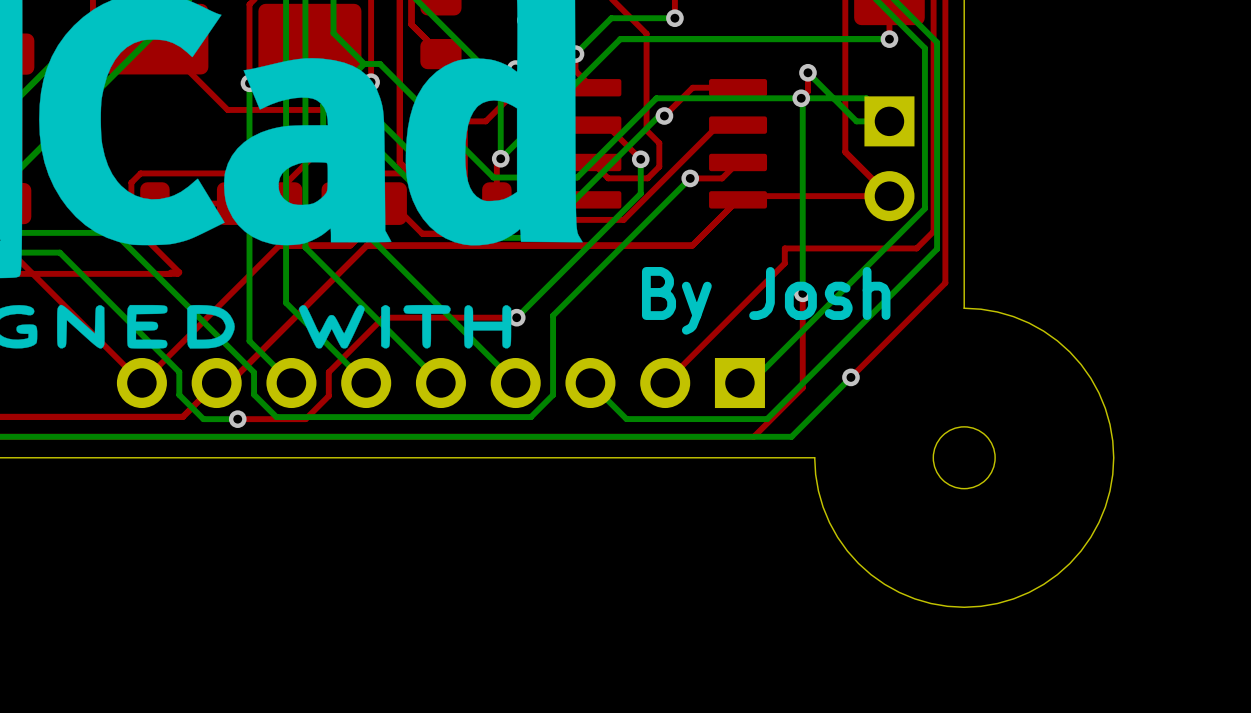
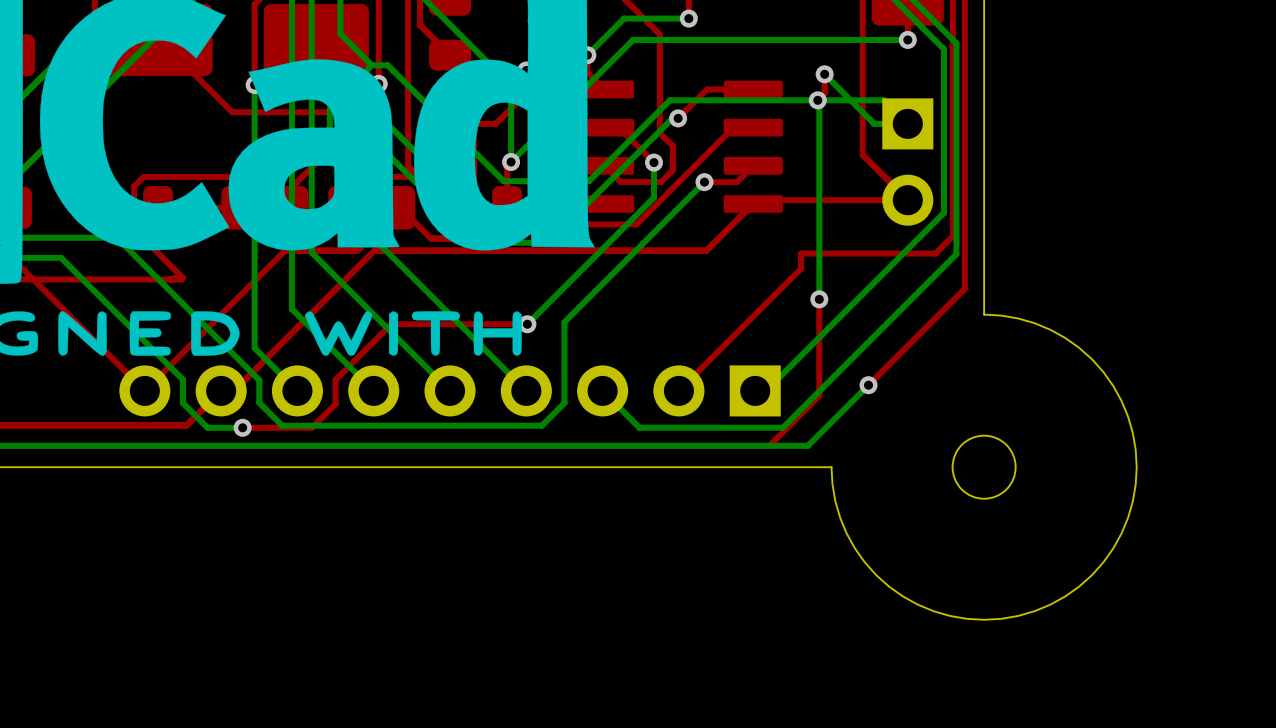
text: By Josh (766, 300) -> none

